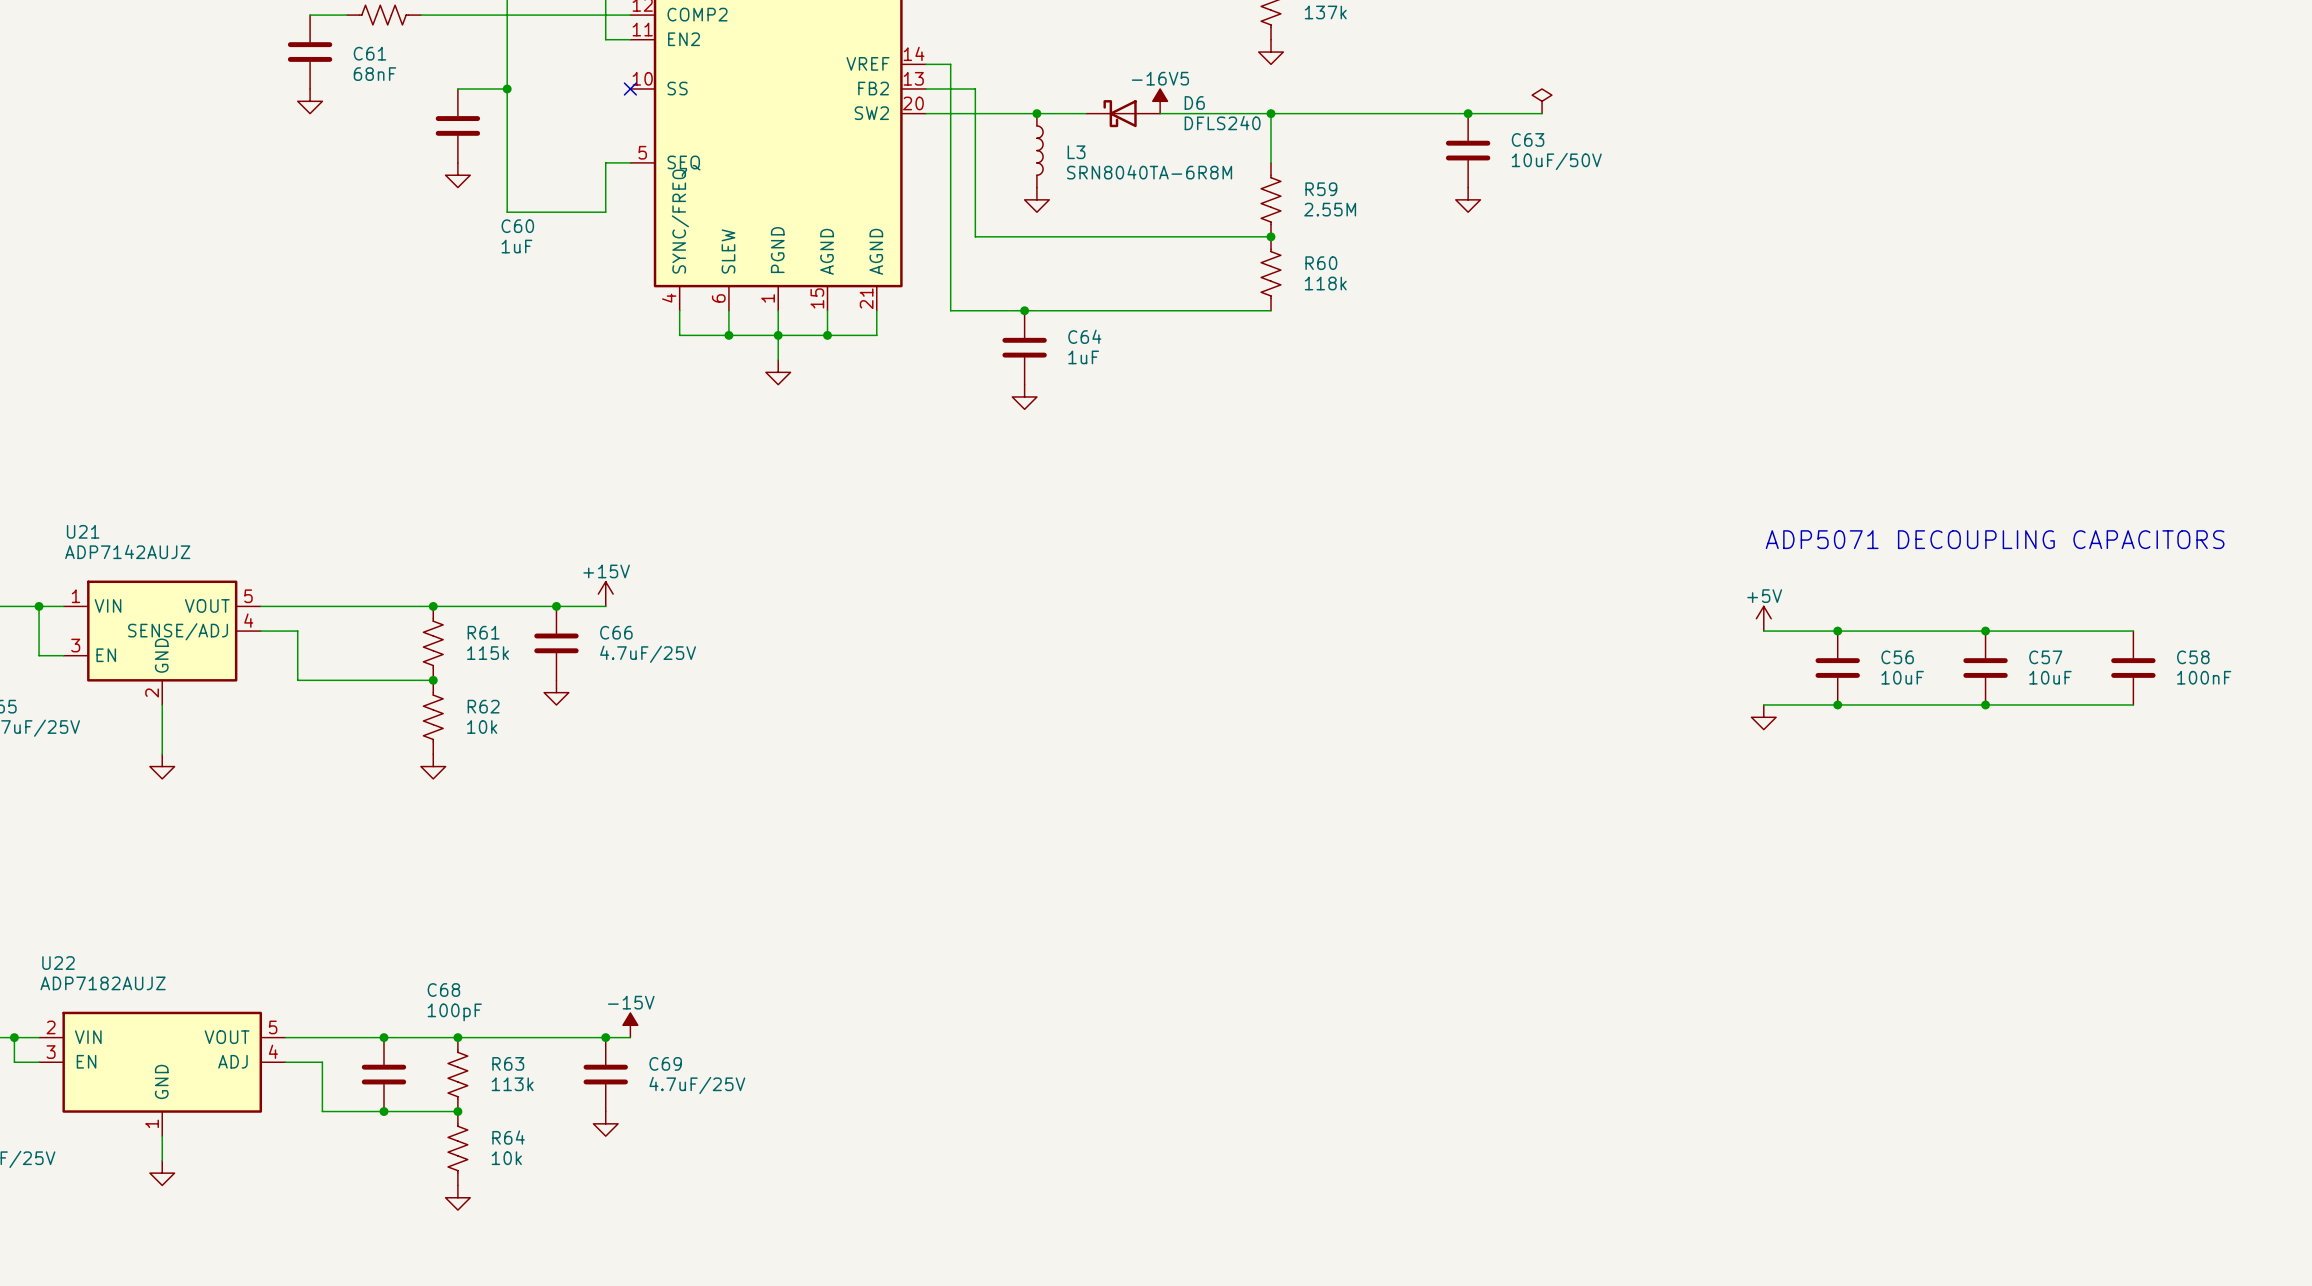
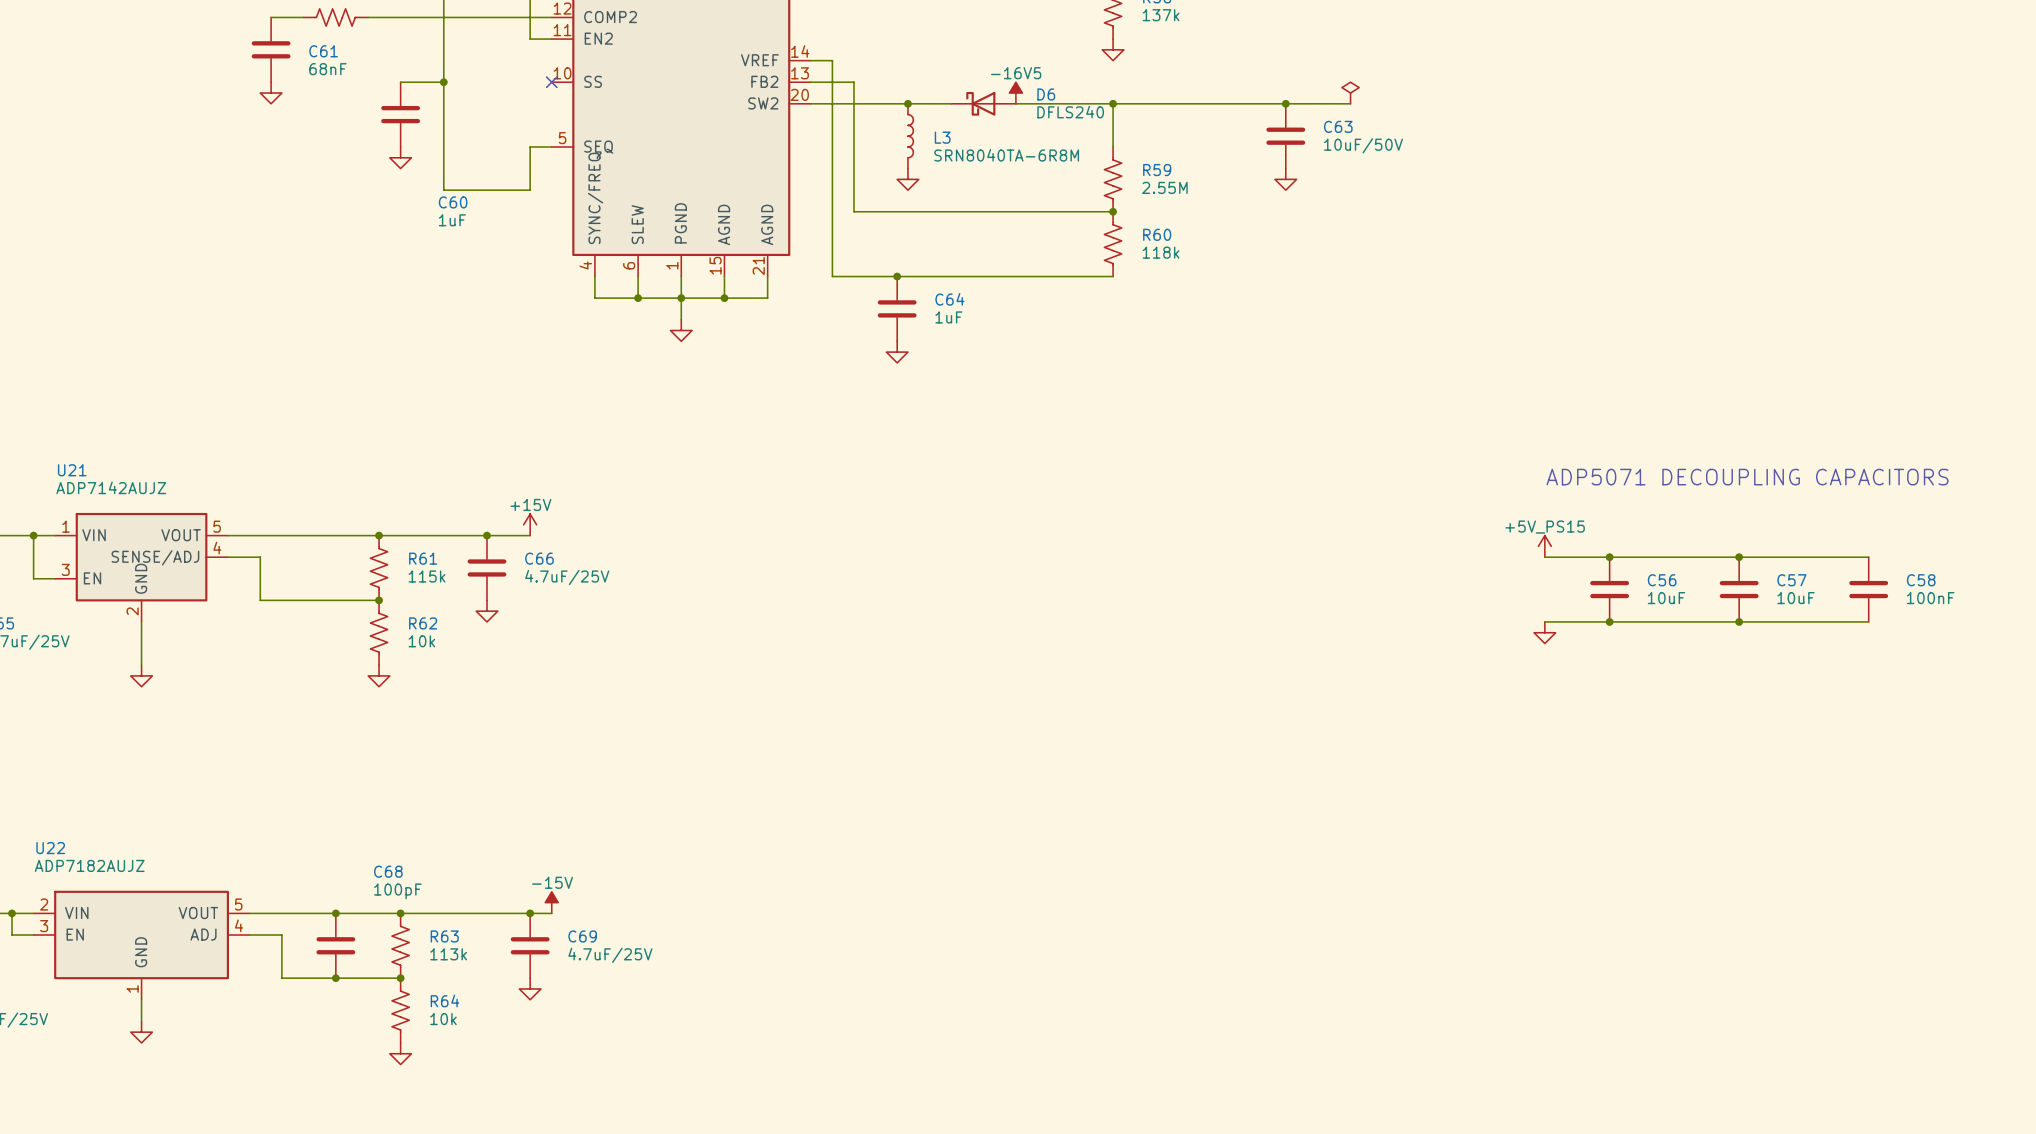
power symbol: +5V (1763, 618) -> +5V_PS15 (1544, 546)

